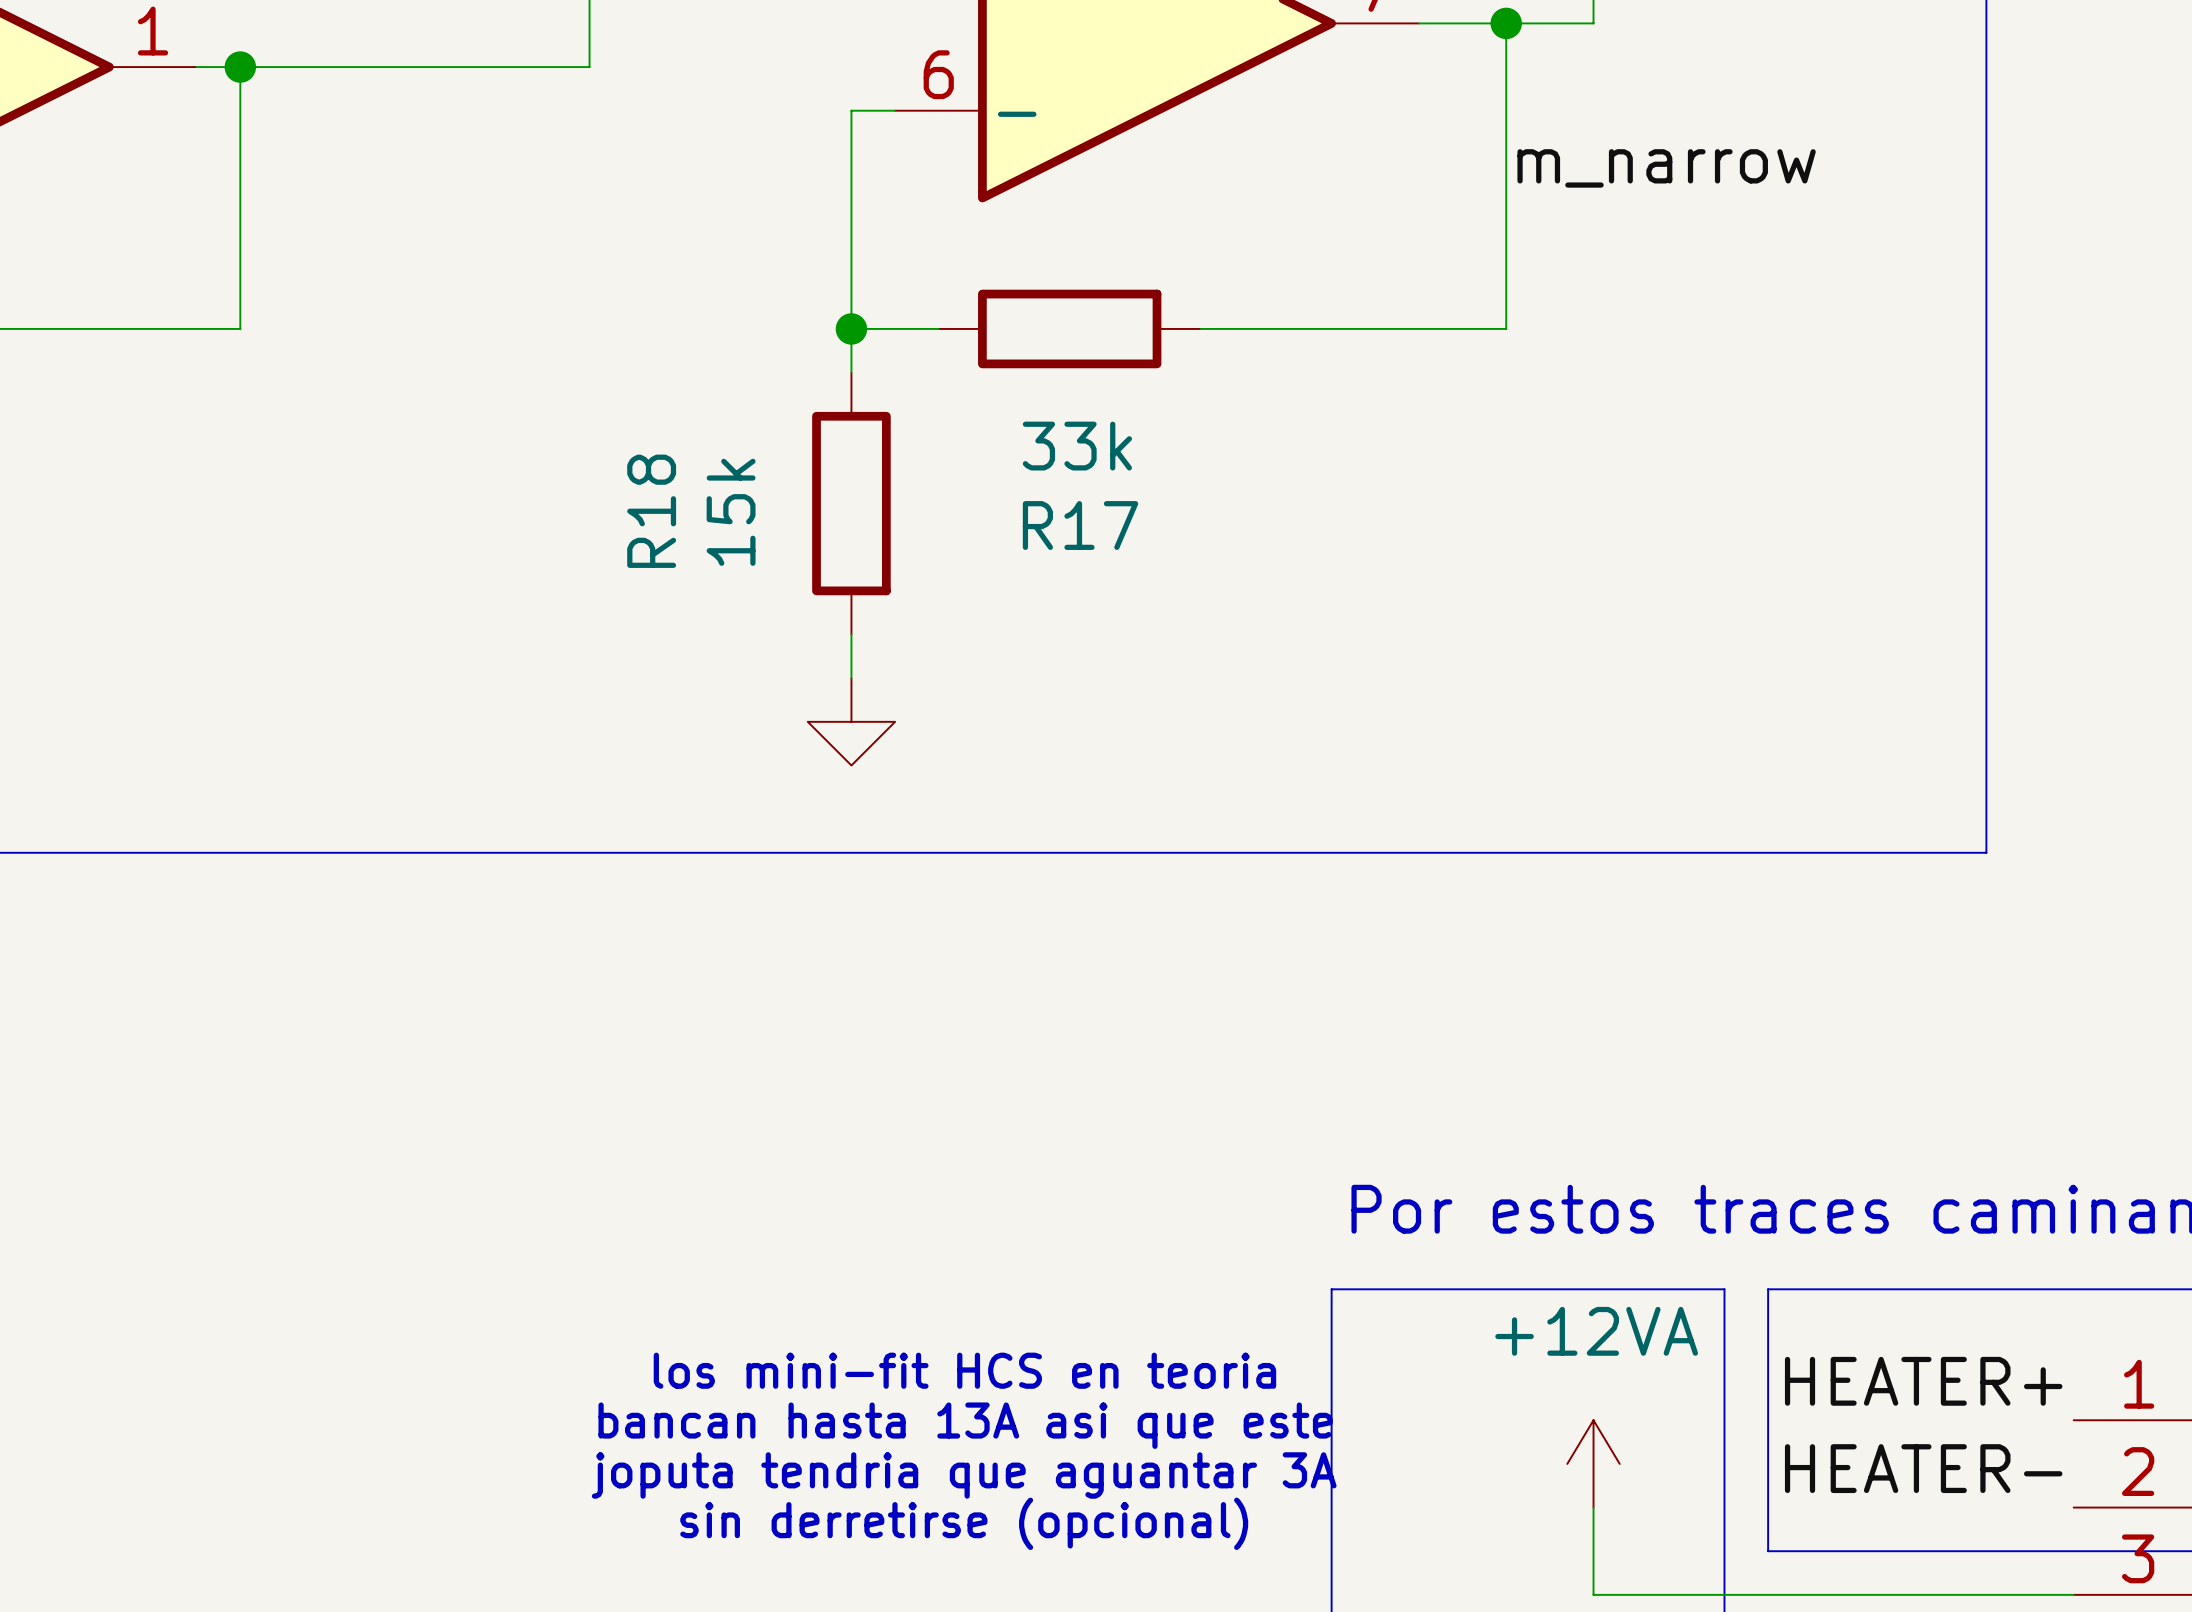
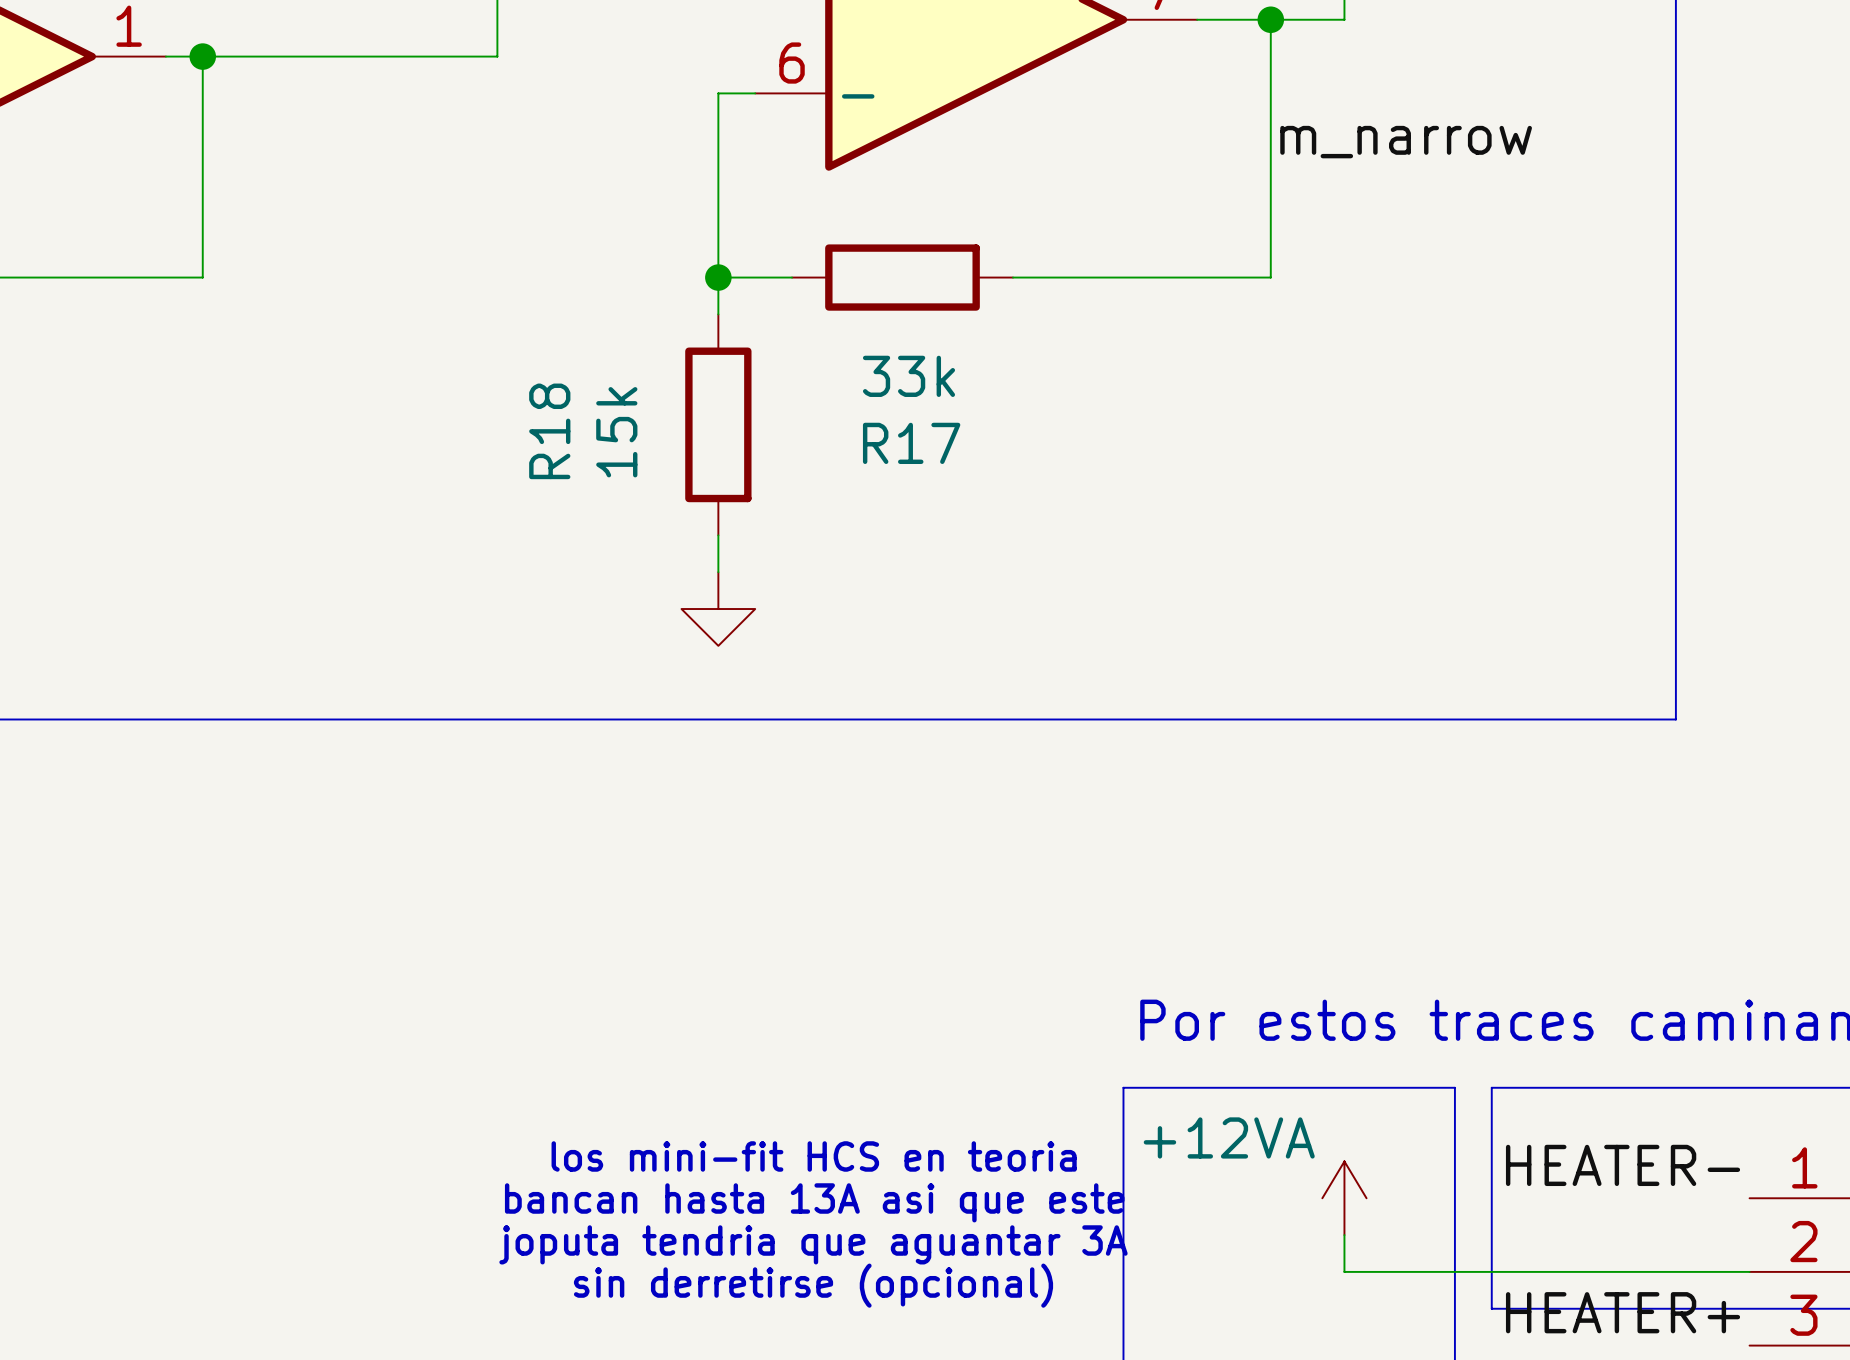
power symbol text position: +12VA (1596, 1331) -> +12VA (1229, 1137)
label: HEATER+ (1923, 1381) -> HEATER- (1623, 1165)
wire: none -> (1344, 1235) (1344, 1271) (1749, 1271)
power symbol position: +12VA (1593, 1463) -> +12VA (1344, 1198)
label: HEATER- (1923, 1468) -> HEATER+ (1623, 1312)
wire: (1593, 1507) (1593, 1594) (2073, 1594) -> none

